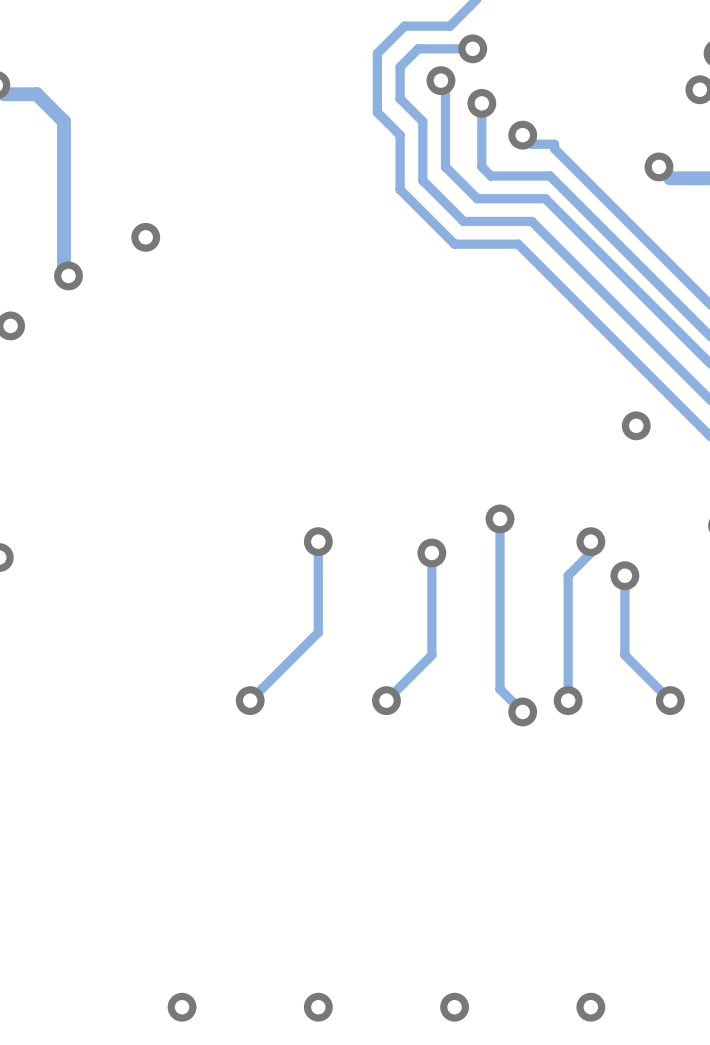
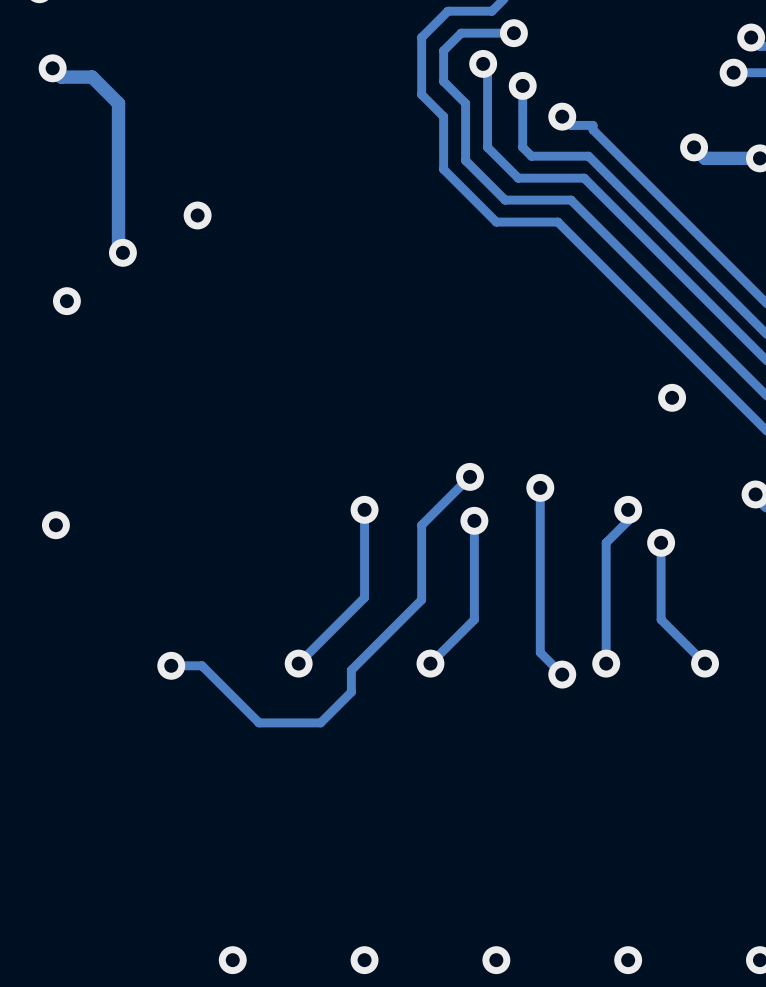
track: none -> (470, 476) (421, 525) (421, 599) (351, 670) (351, 692) (320, 722) (259, 722) (202, 665) (171, 665)
via: none -> (470, 476)
via: none -> (171, 665)

